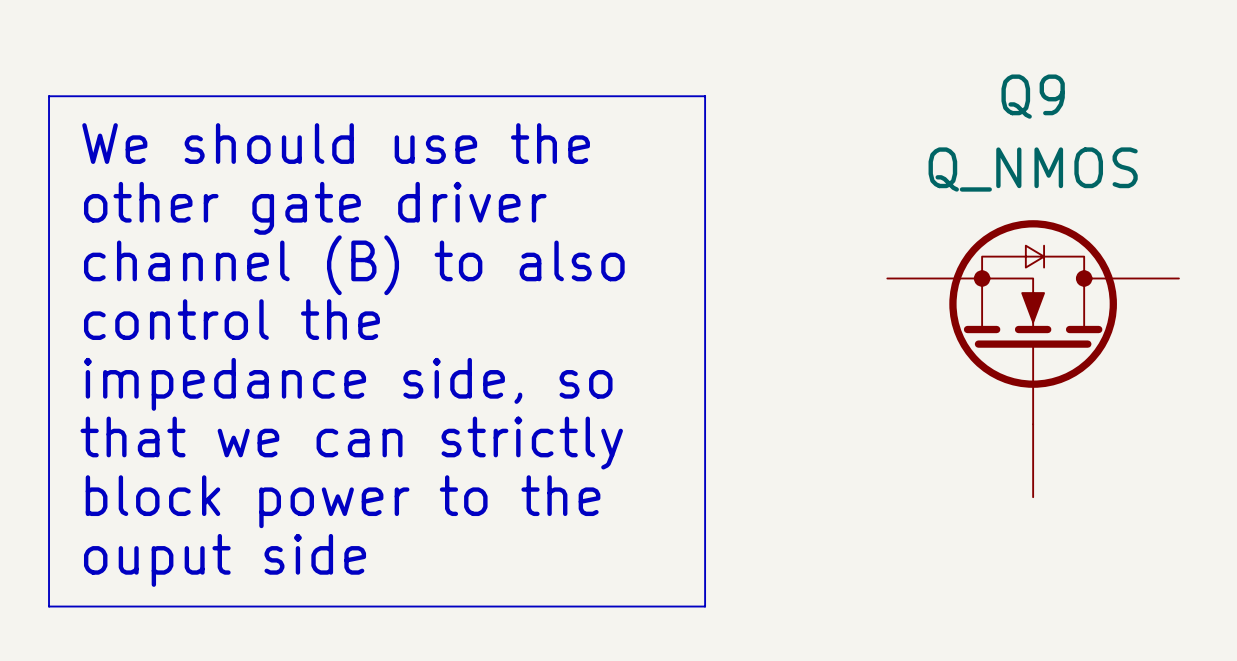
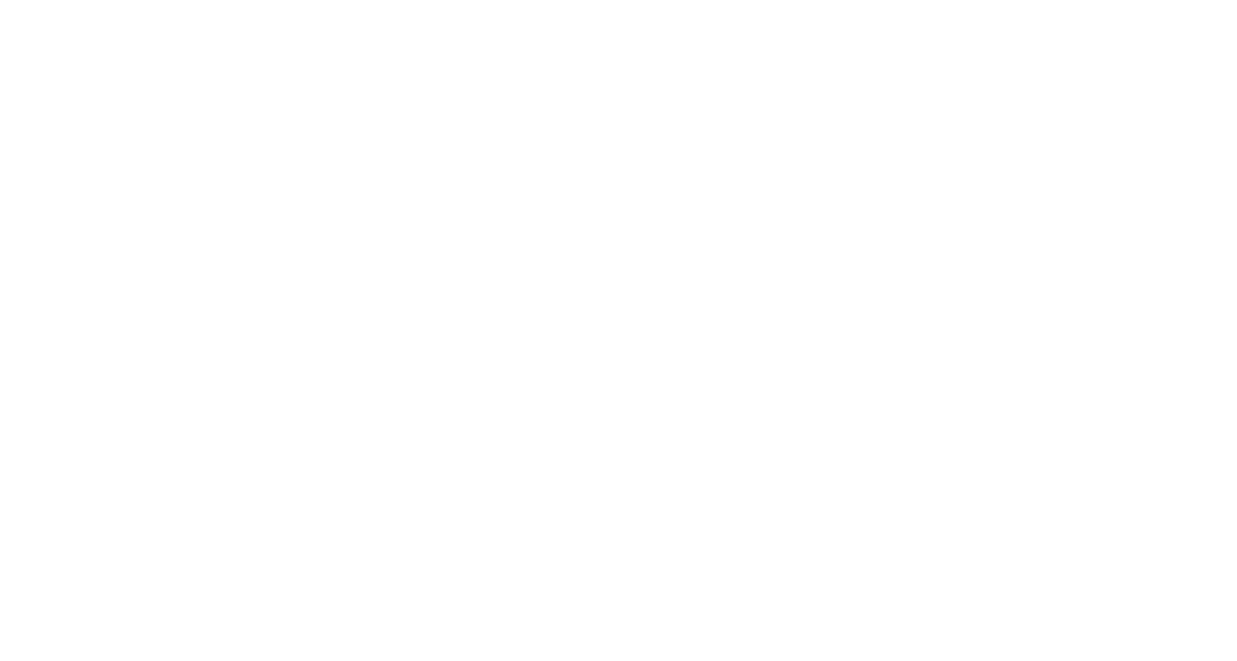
line: (49, 96) (705, 96) (705, 606) (49, 606) (49, 96) -> none
text: We should use the (336, 143) -> none
text: other gate driver (315, 208) -> none
text: channel (B) to also (354, 265) -> none
text: control the (231, 319) -> none
Q9: Q_NMOS (1033, 358) -> none
text: impedance side, so (348, 384) -> none
text: that we can strictly (351, 443) -> none
text: block power to the (343, 501) -> none
text: ouput side (225, 560) -> none

